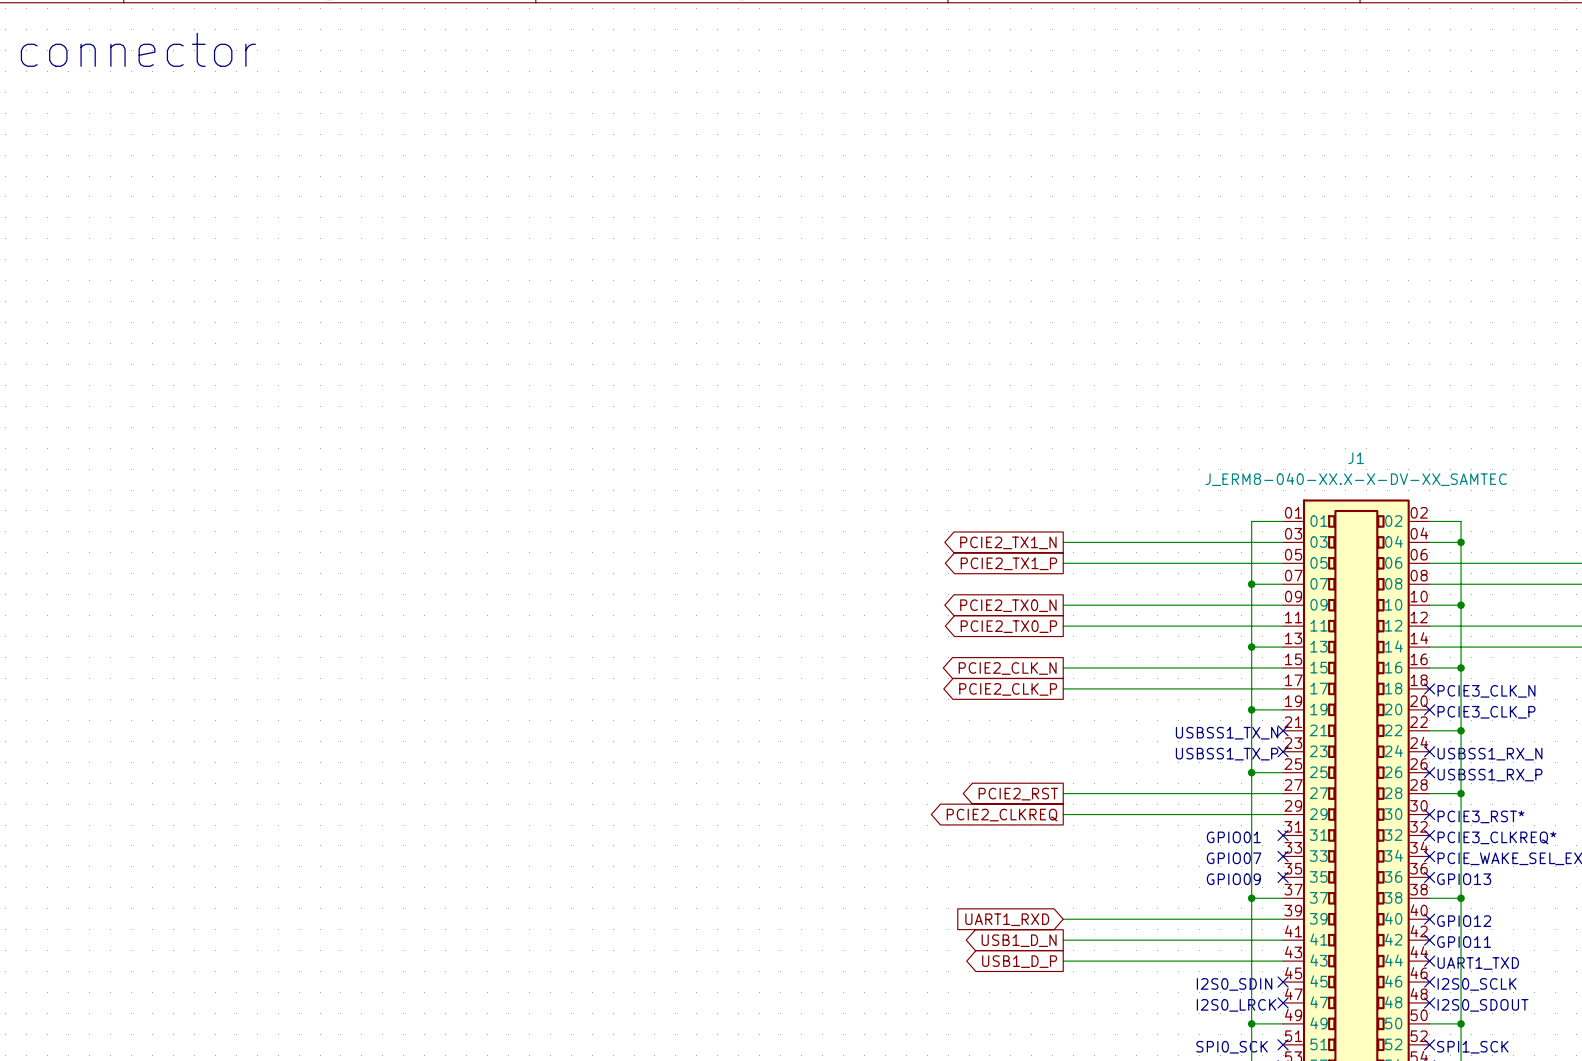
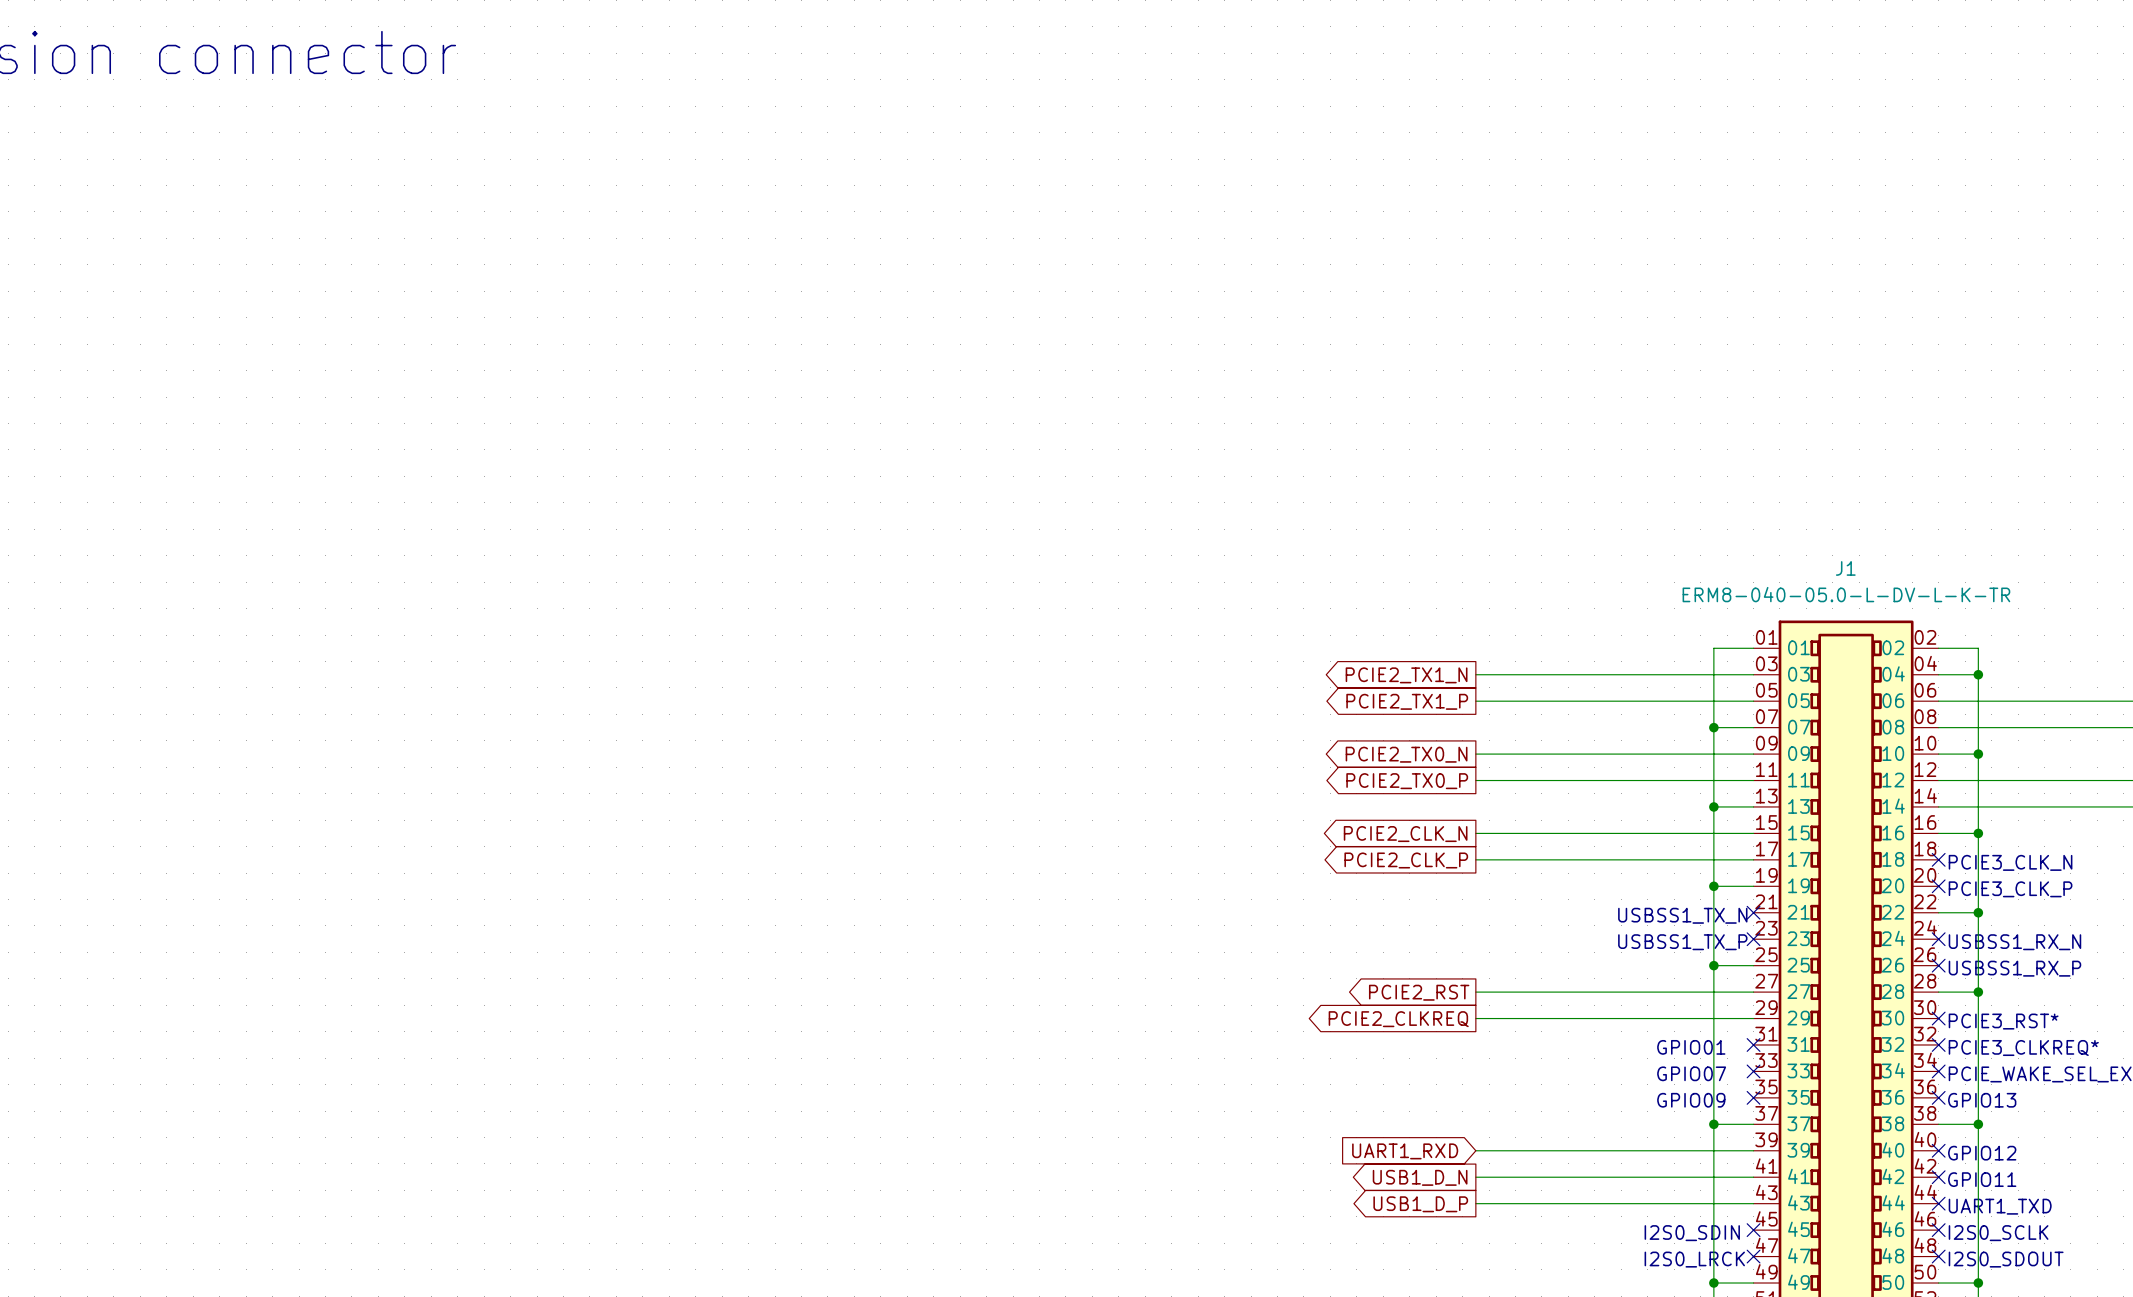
J1 text: none -> ERM8-040-05.0-L-DV-L-K-TR (1846, 594)
J1 value: J_ERM8-040-XX.X-X-DV-XX_SAMTEC (1356, 479) -> none

